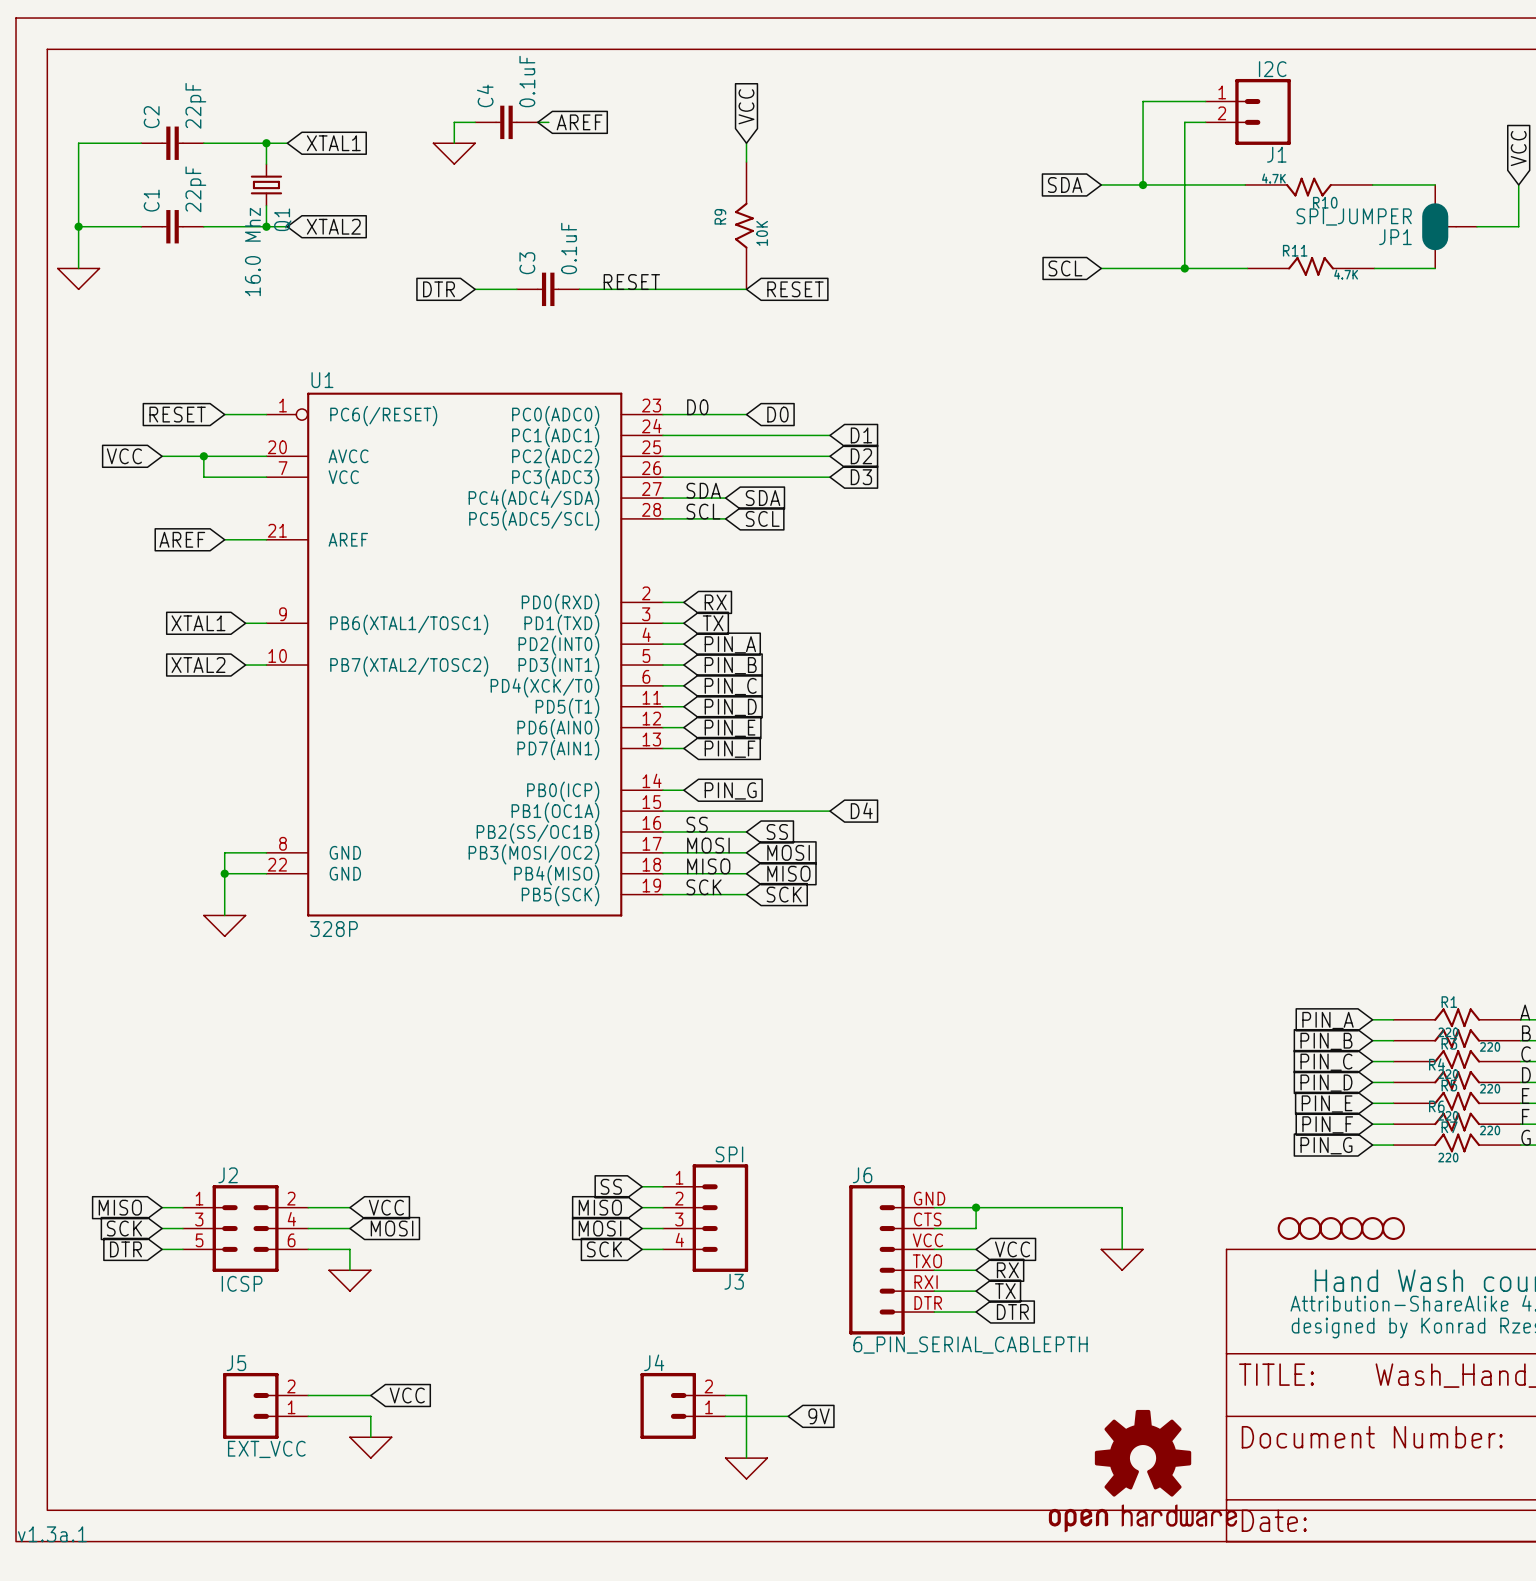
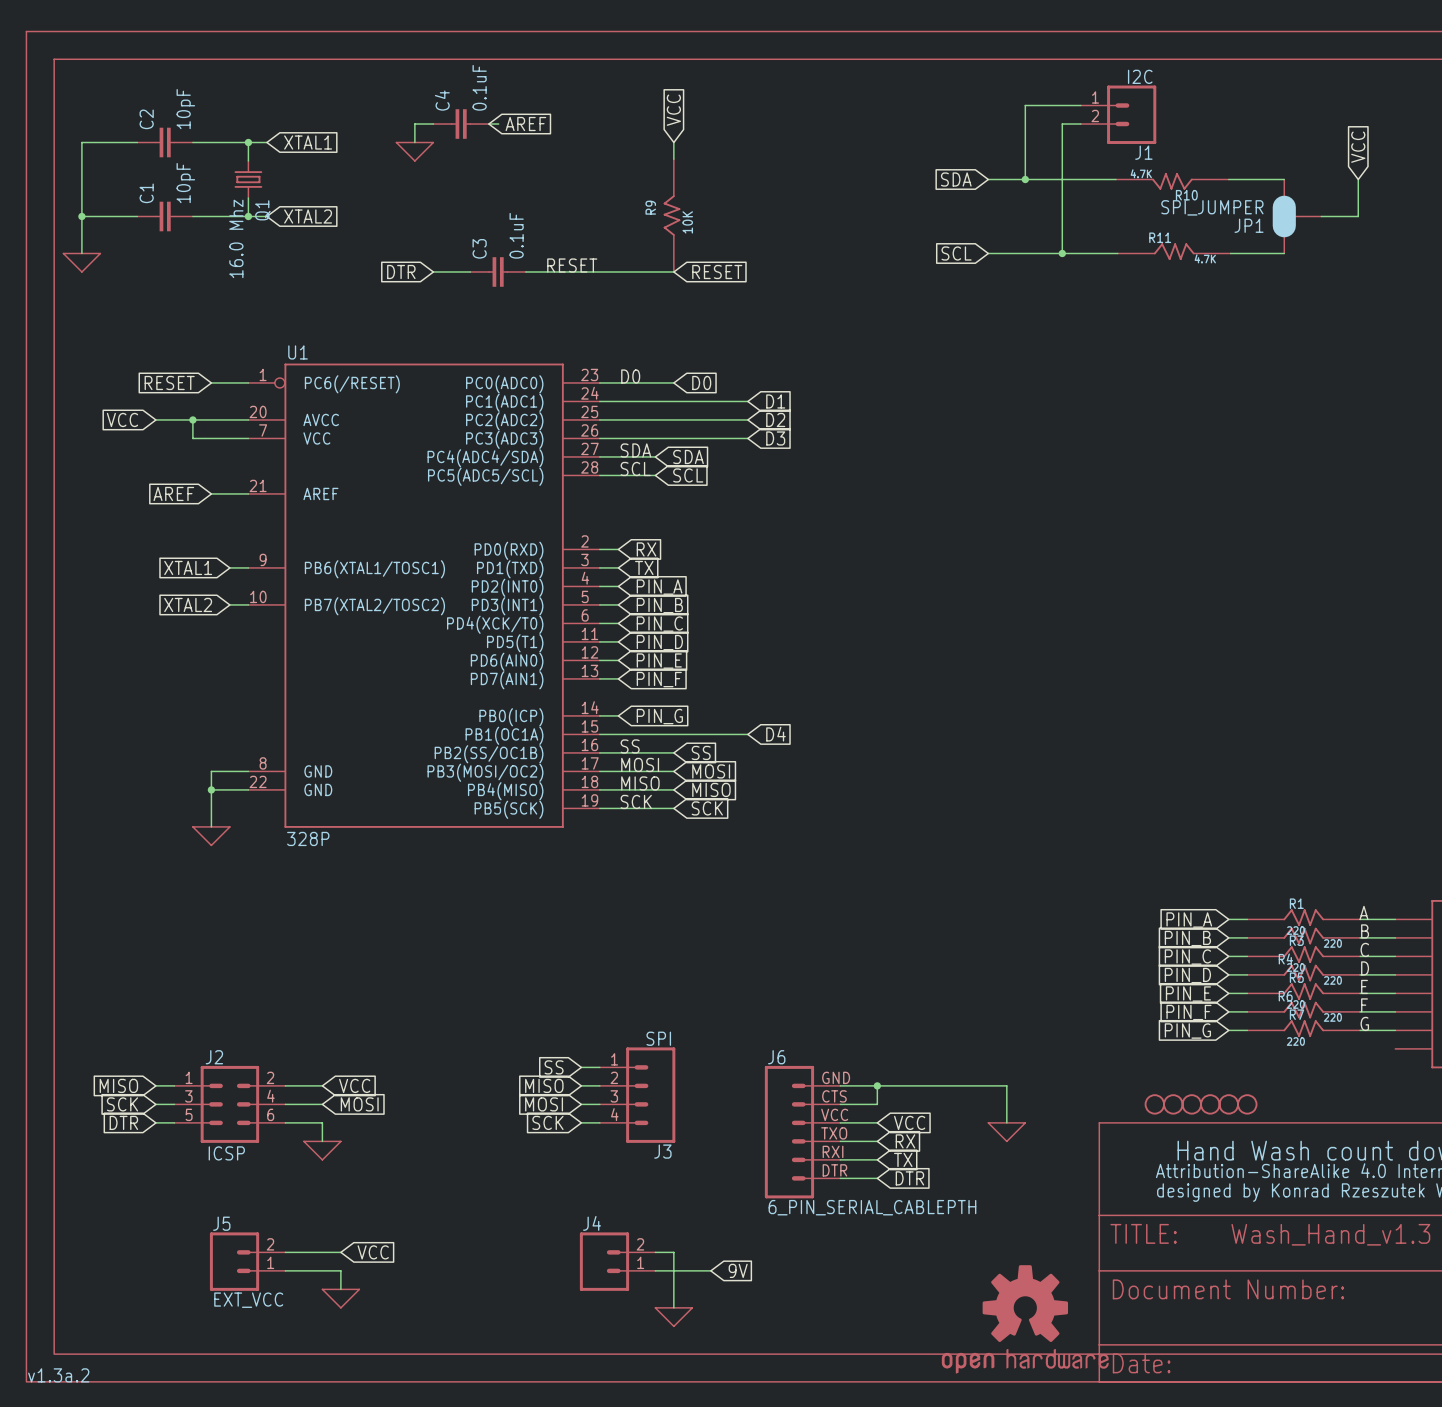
C2 value: 22pF (195, 105) -> 10pF (185, 109)
C1 value: 22pF (195, 189) -> 10pF (185, 183)
part text: v1.3a.1 (52, 1534) -> v1.3a.2 (58, 1375)

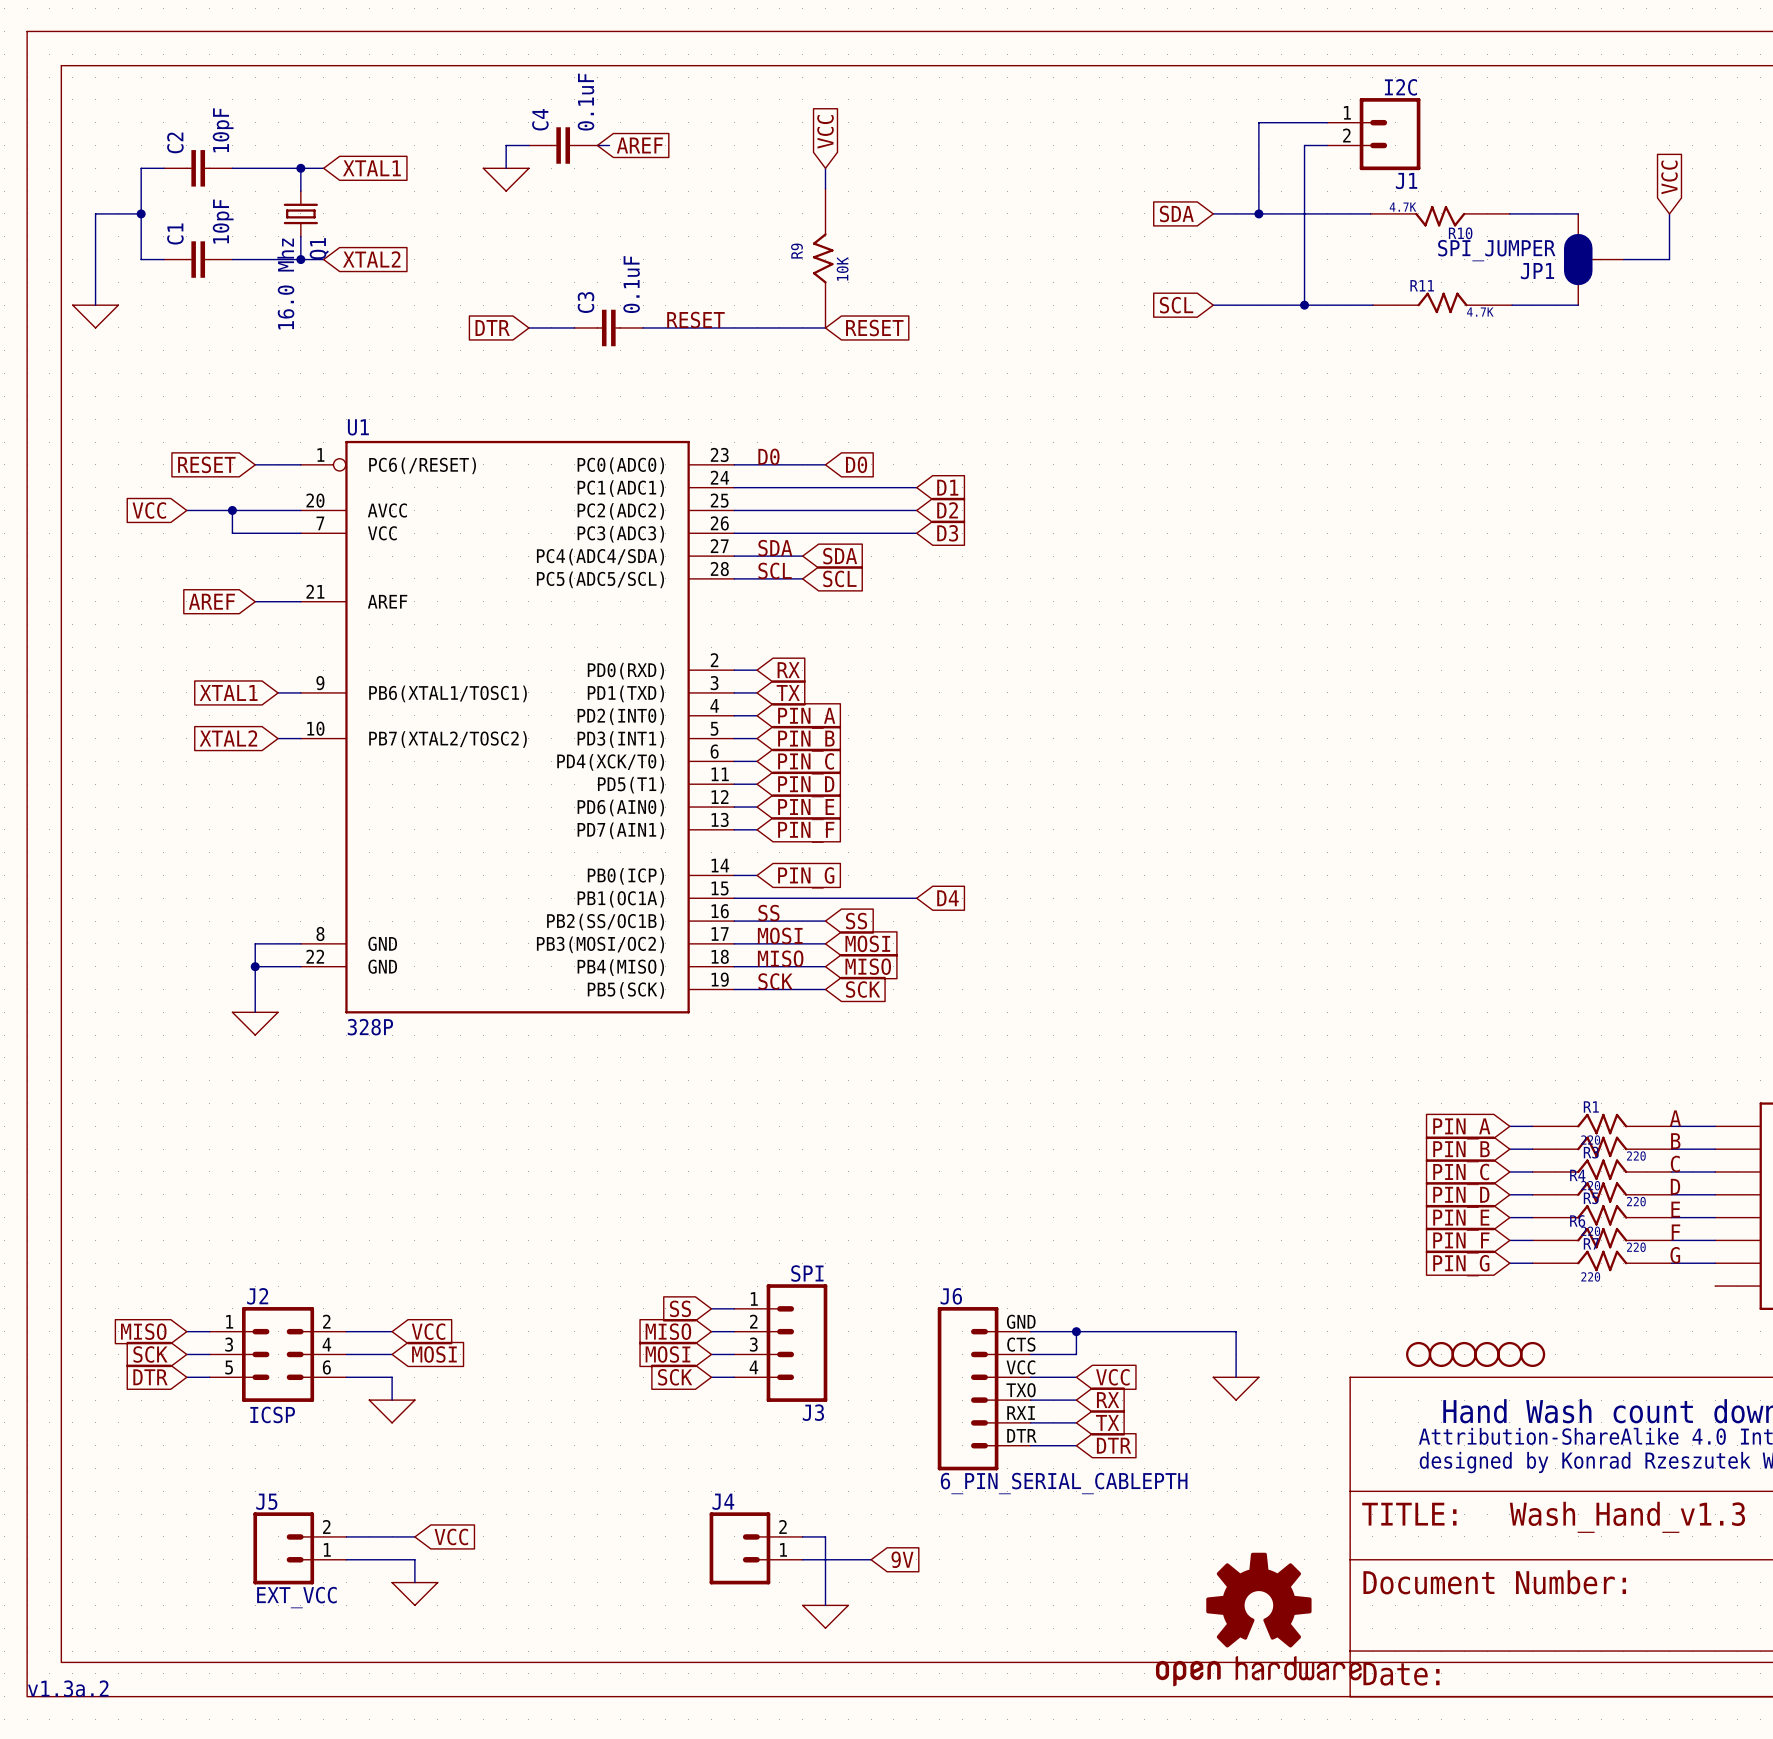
wire: (118, 142) (81, 142) (81, 179) -> (141, 213) (95, 213)
junction: none -> (141, 213)
wire: (81, 216) (118, 216) -> (141, 168) (141, 259)
junction: (81, 216) -> none

